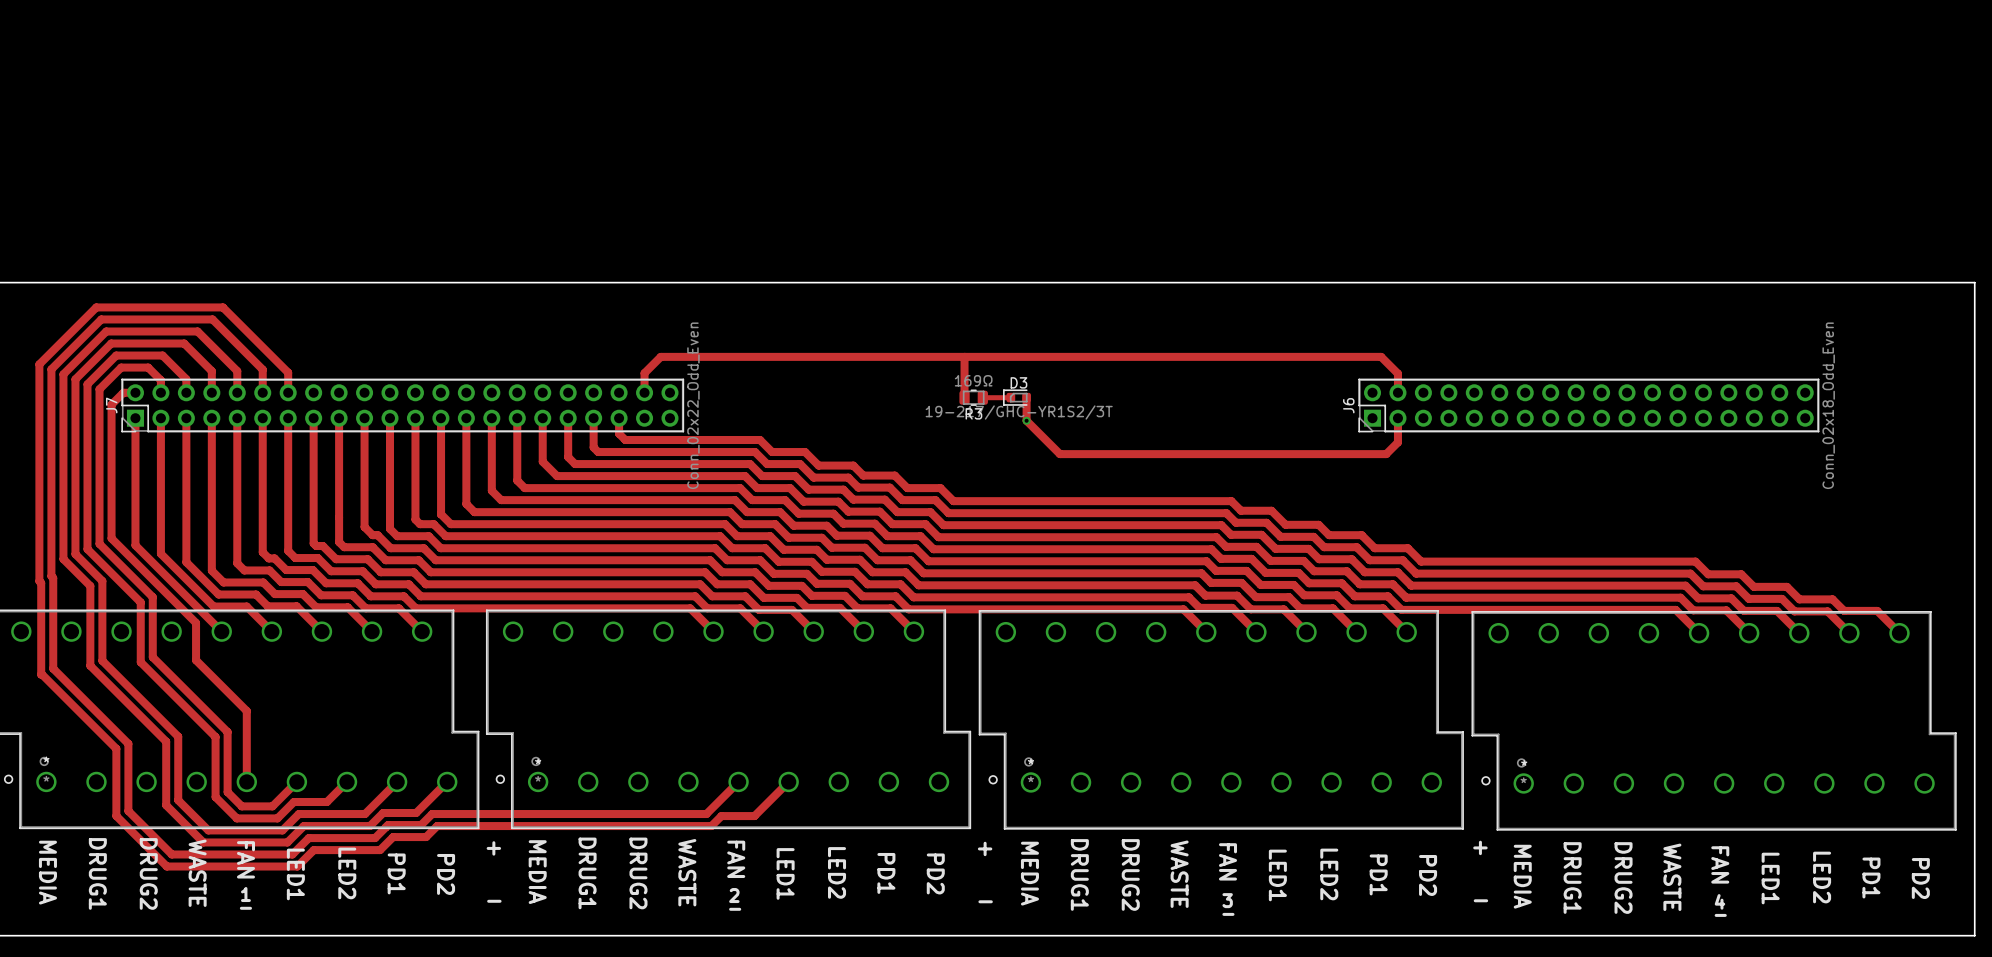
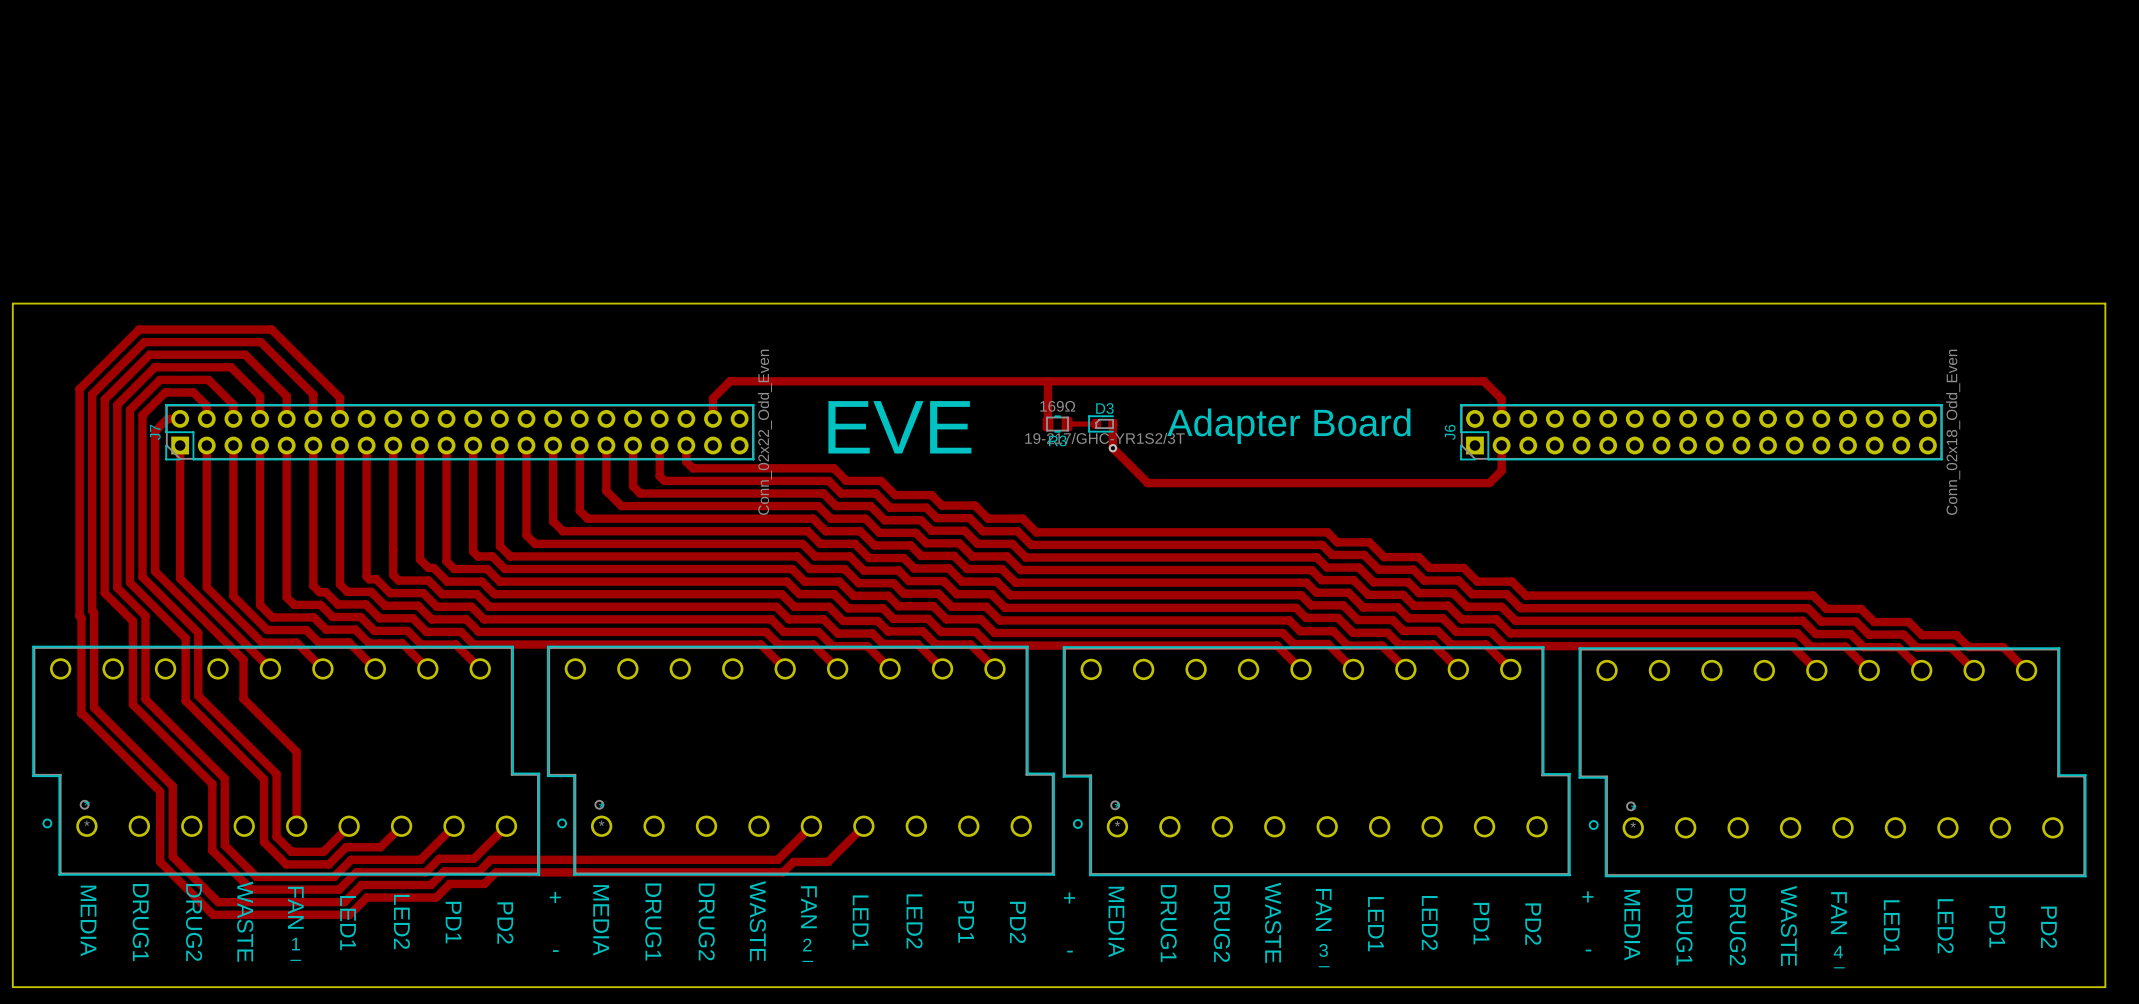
text: none -> EVE (899, 427)
text: none -> Adapter Board (1288, 426)

